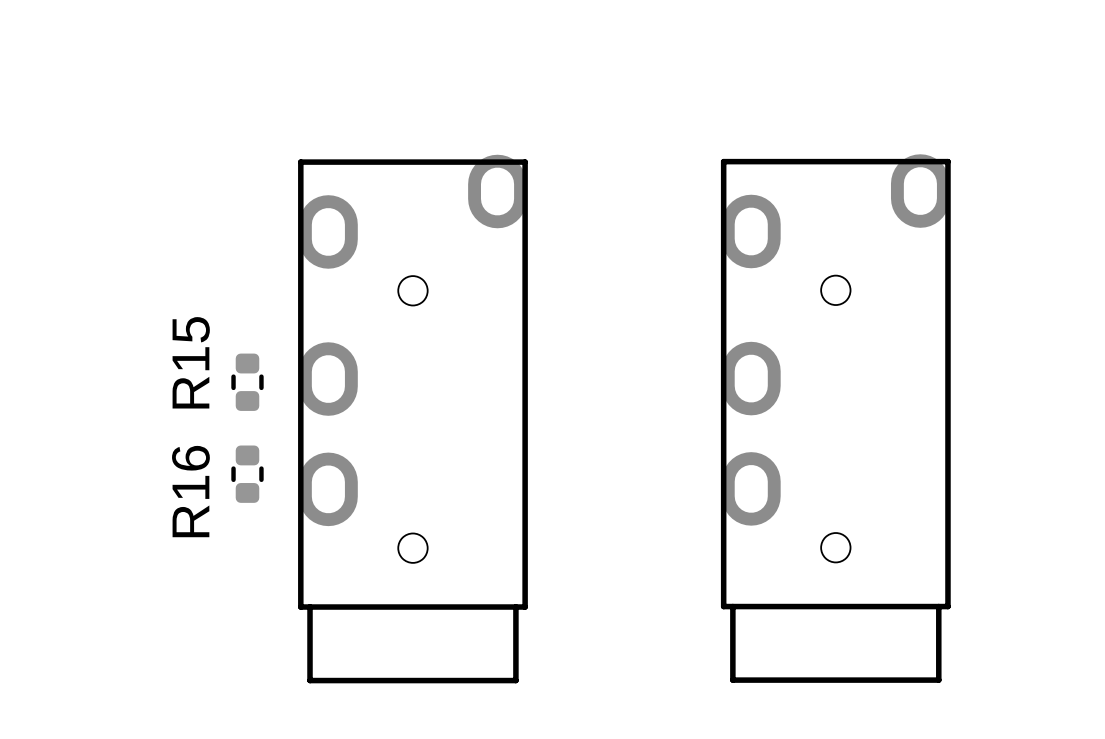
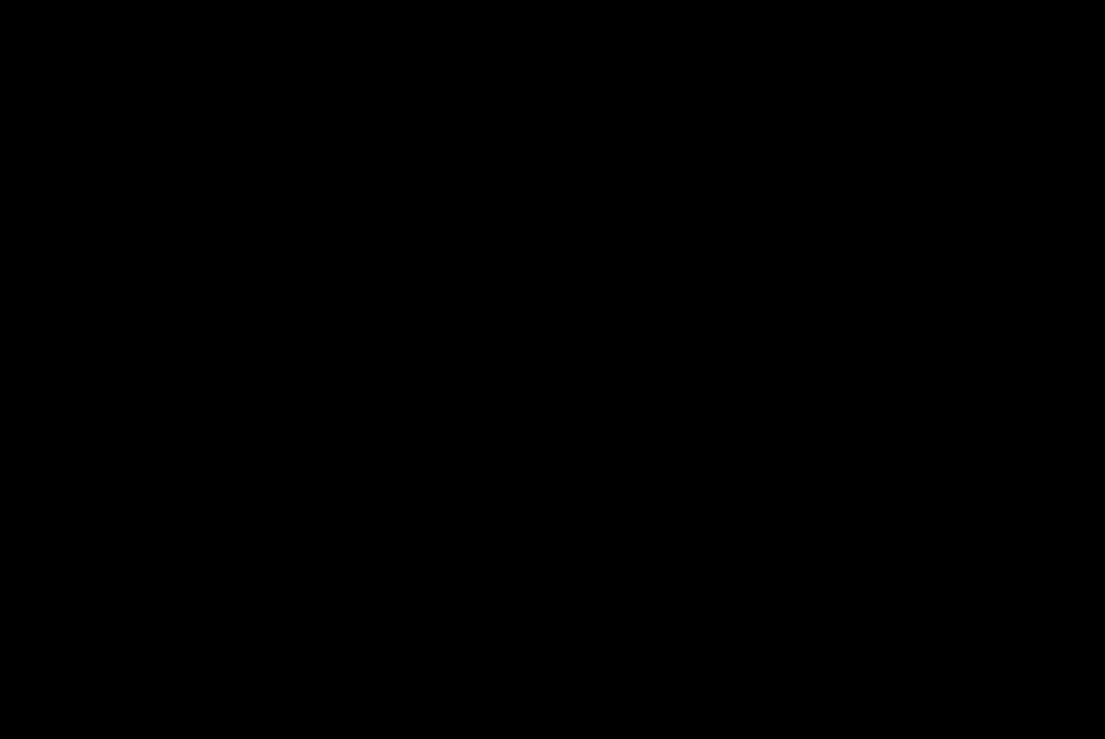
R15: (247, 382) -> none
part: (835, 418) -> none
part: (412, 419) -> none
R16: (247, 474) -> none

